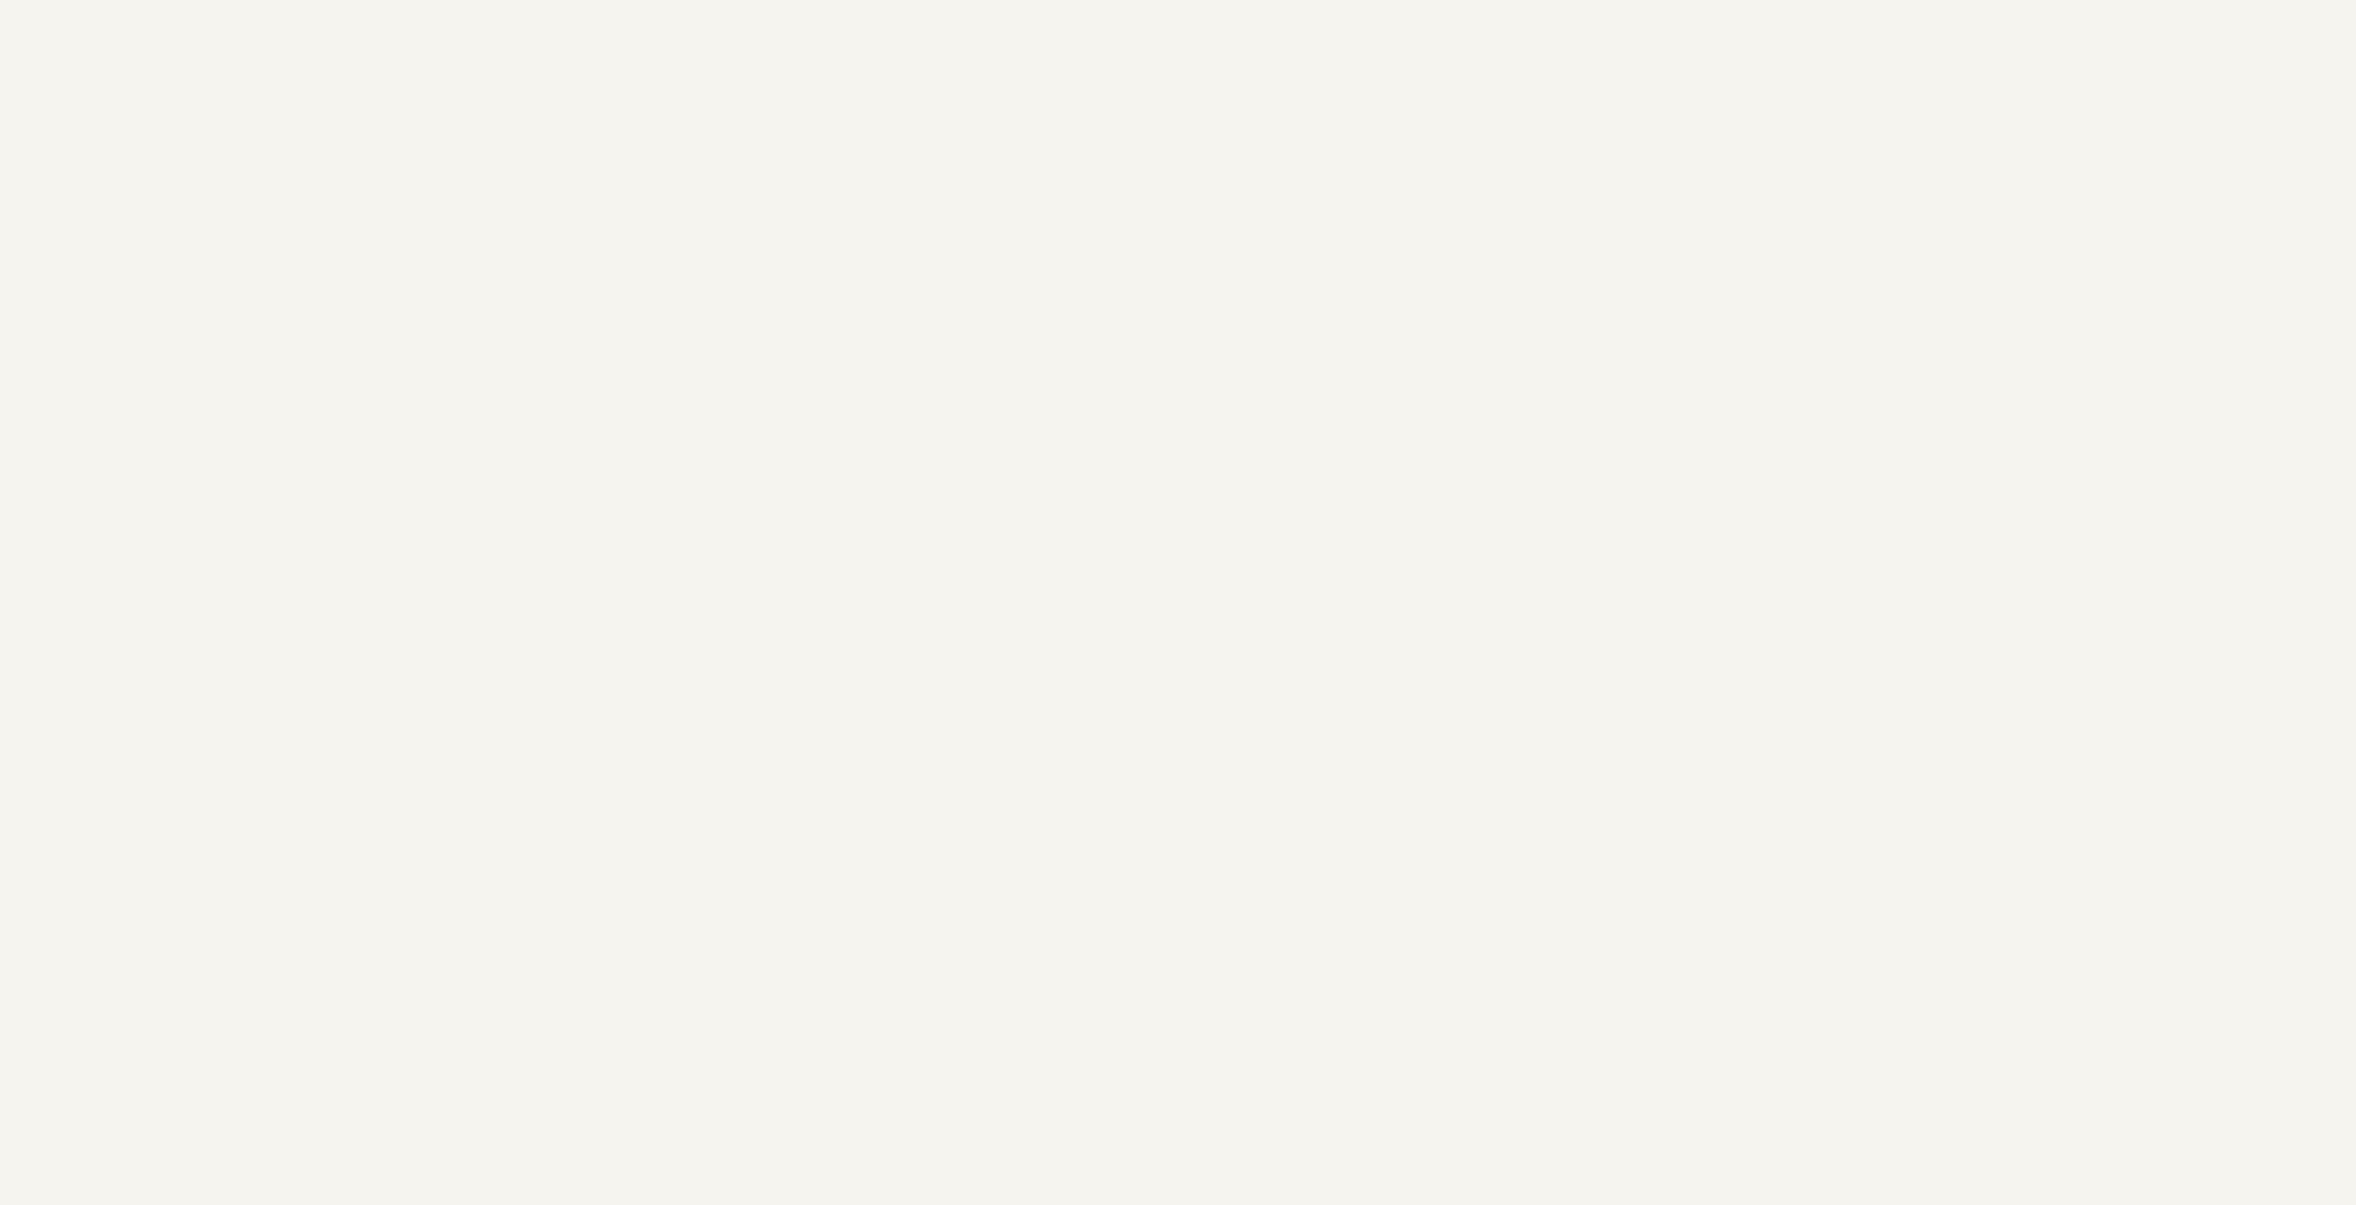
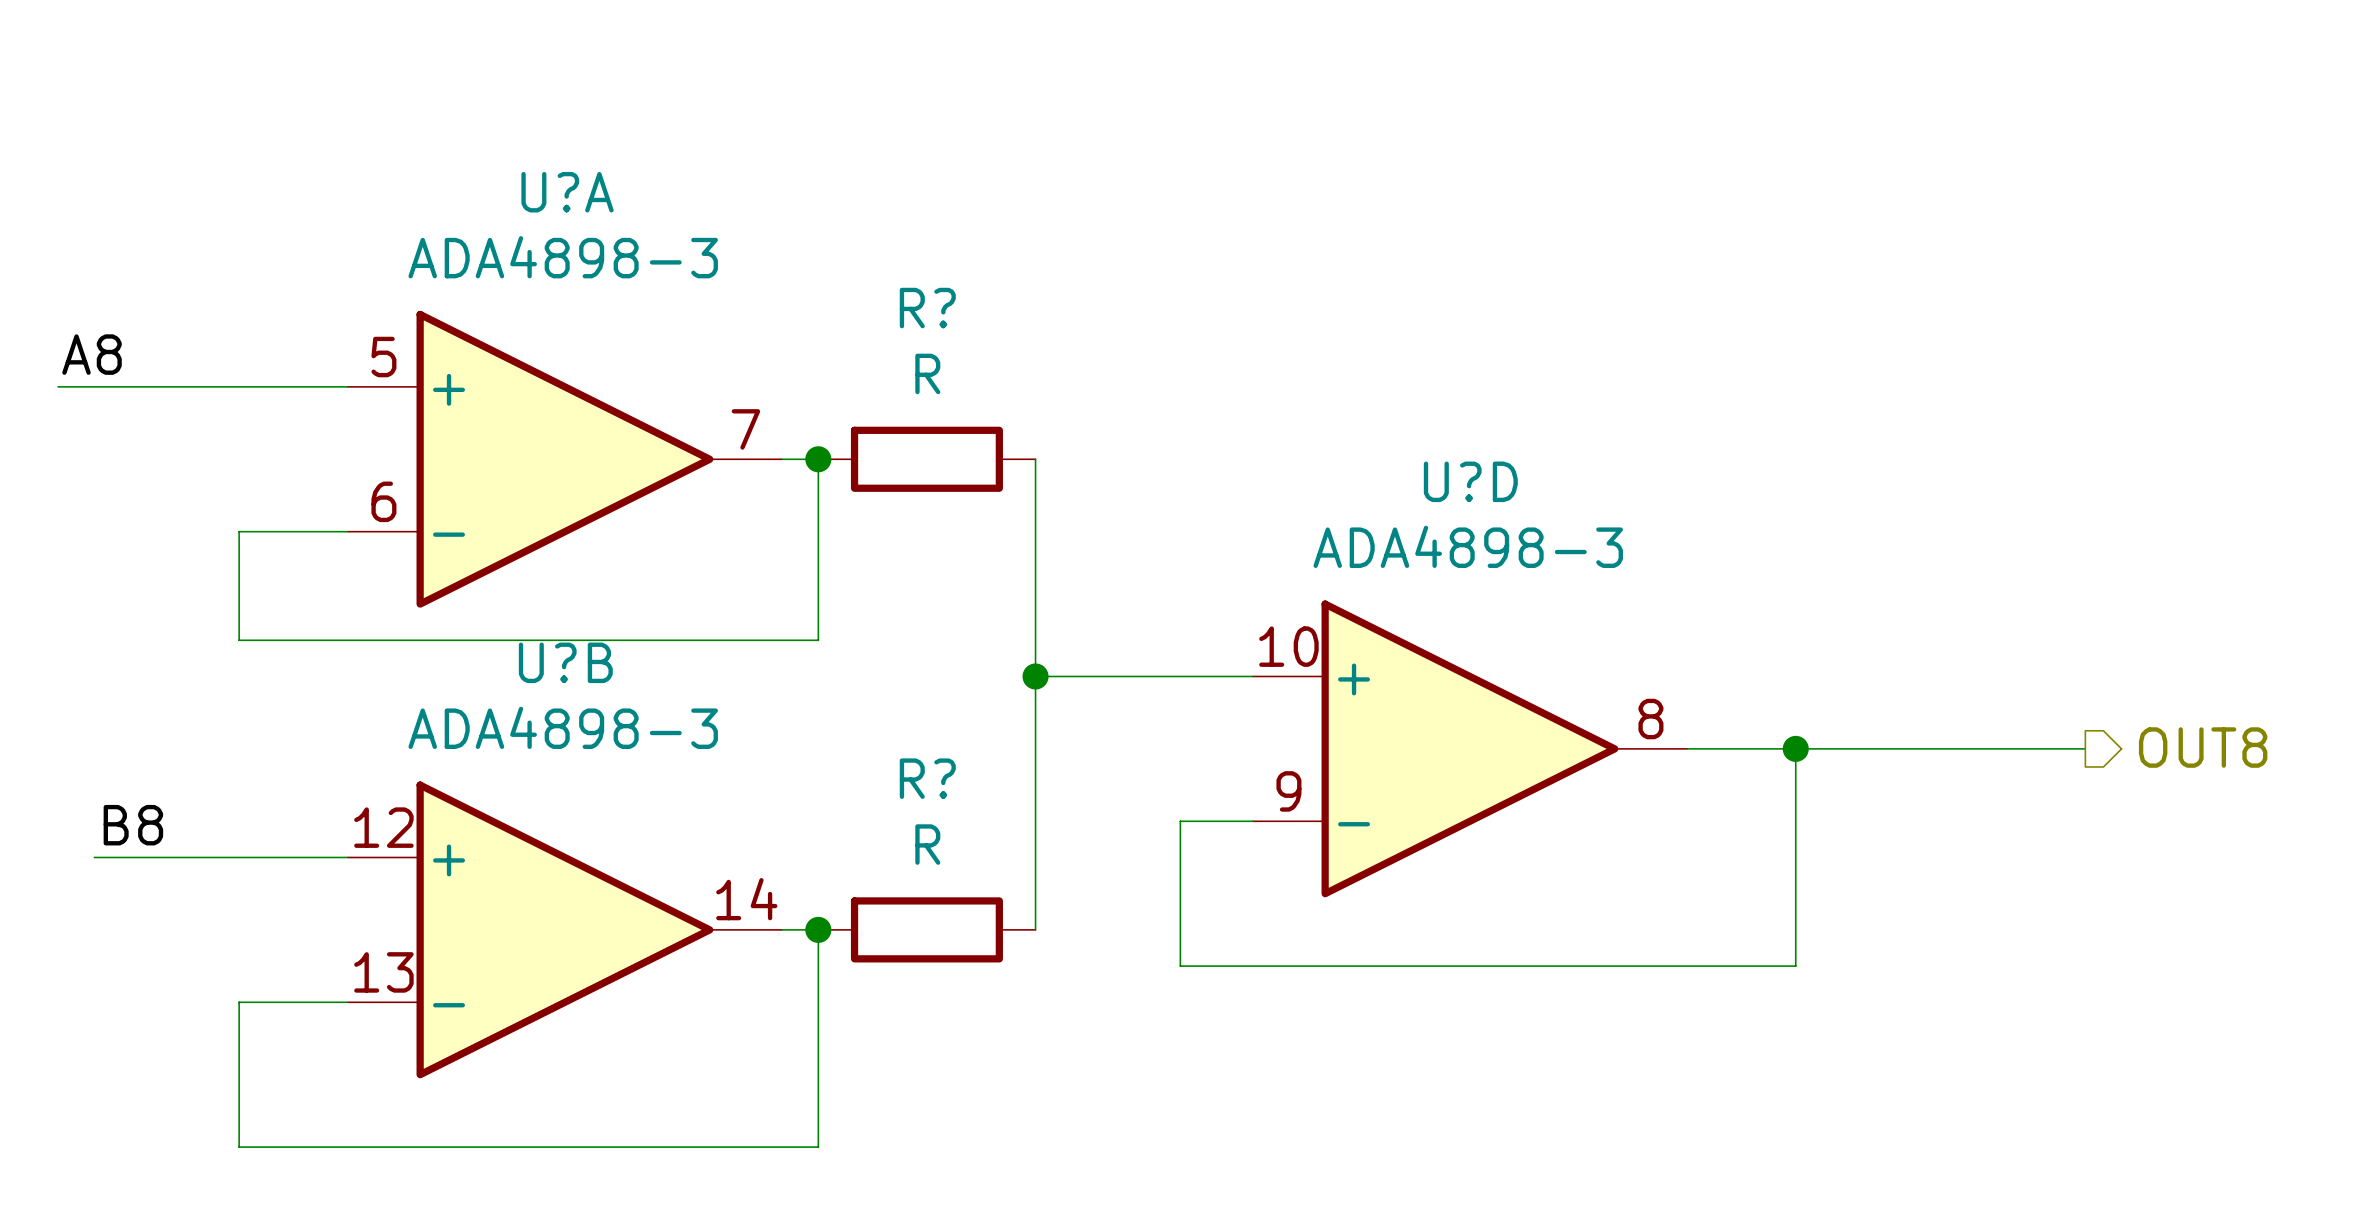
label: none -> A8 (92, 354)
wire: none -> (58, 386) (347, 386)
U?A: none -> ADA4898-3 (564, 459)
wire: none -> (782, 459) (818, 459) (818, 640) (239, 640) (239, 531) (347, 531)
junction: none -> (818, 459)
R?: none -> R (926, 459)
wire: none -> (1035, 459) (1035, 929)
wire: none -> (1035, 676) (1252, 676)
junction: none -> (1035, 676)
hierarchical label: none -> OUT8 (2203, 747)
U?D: none -> ADA4898-3 (1469, 748)
wire: none -> (1687, 748) (2085, 748)
wire: none -> (1795, 748) (1795, 966) (1180, 966) (1180, 821) (1252, 821)
junction: none -> (1795, 748)
label: none -> B8 (133, 825)
wire: none -> (94, 857) (347, 857)
U?B: none -> ADA4898-3 (564, 929)
wire: none -> (782, 929) (818, 929) (818, 1147) (239, 1147) (239, 1002) (347, 1002)
junction: none -> (818, 929)
R?: none -> R (926, 929)

